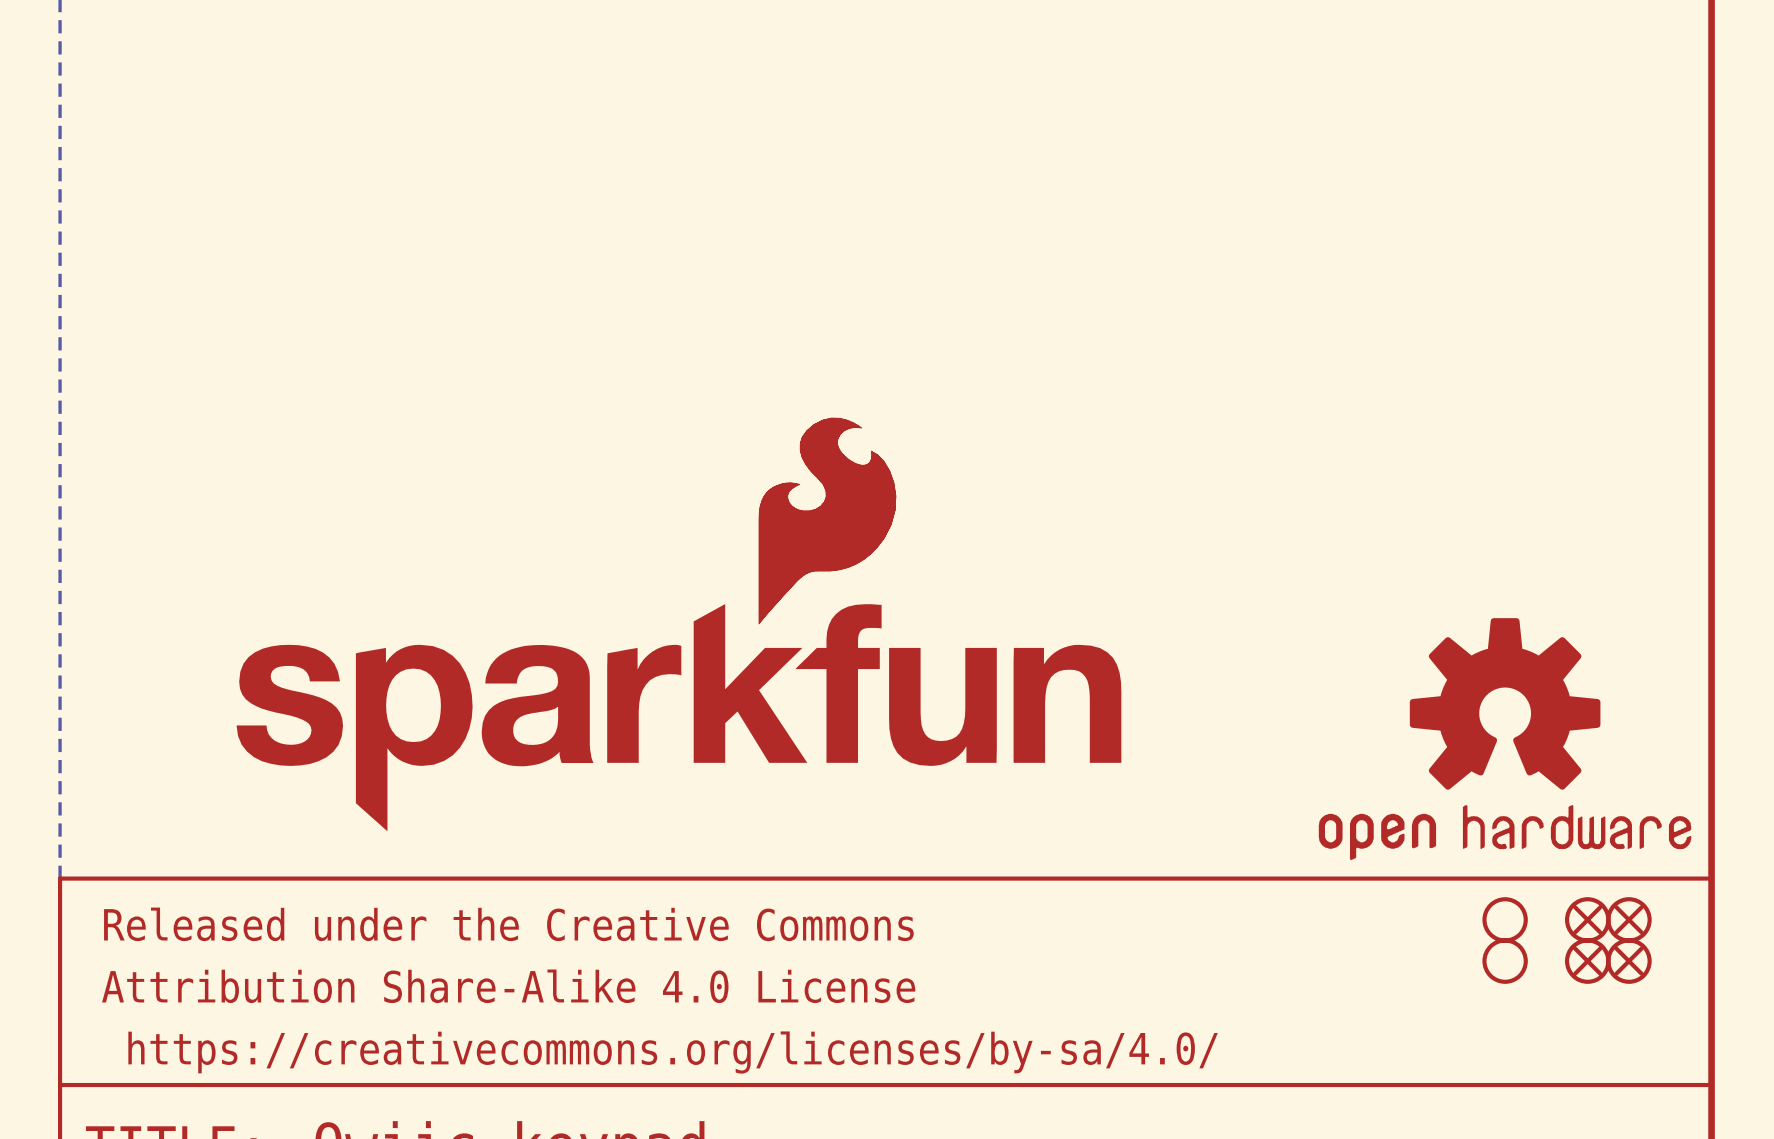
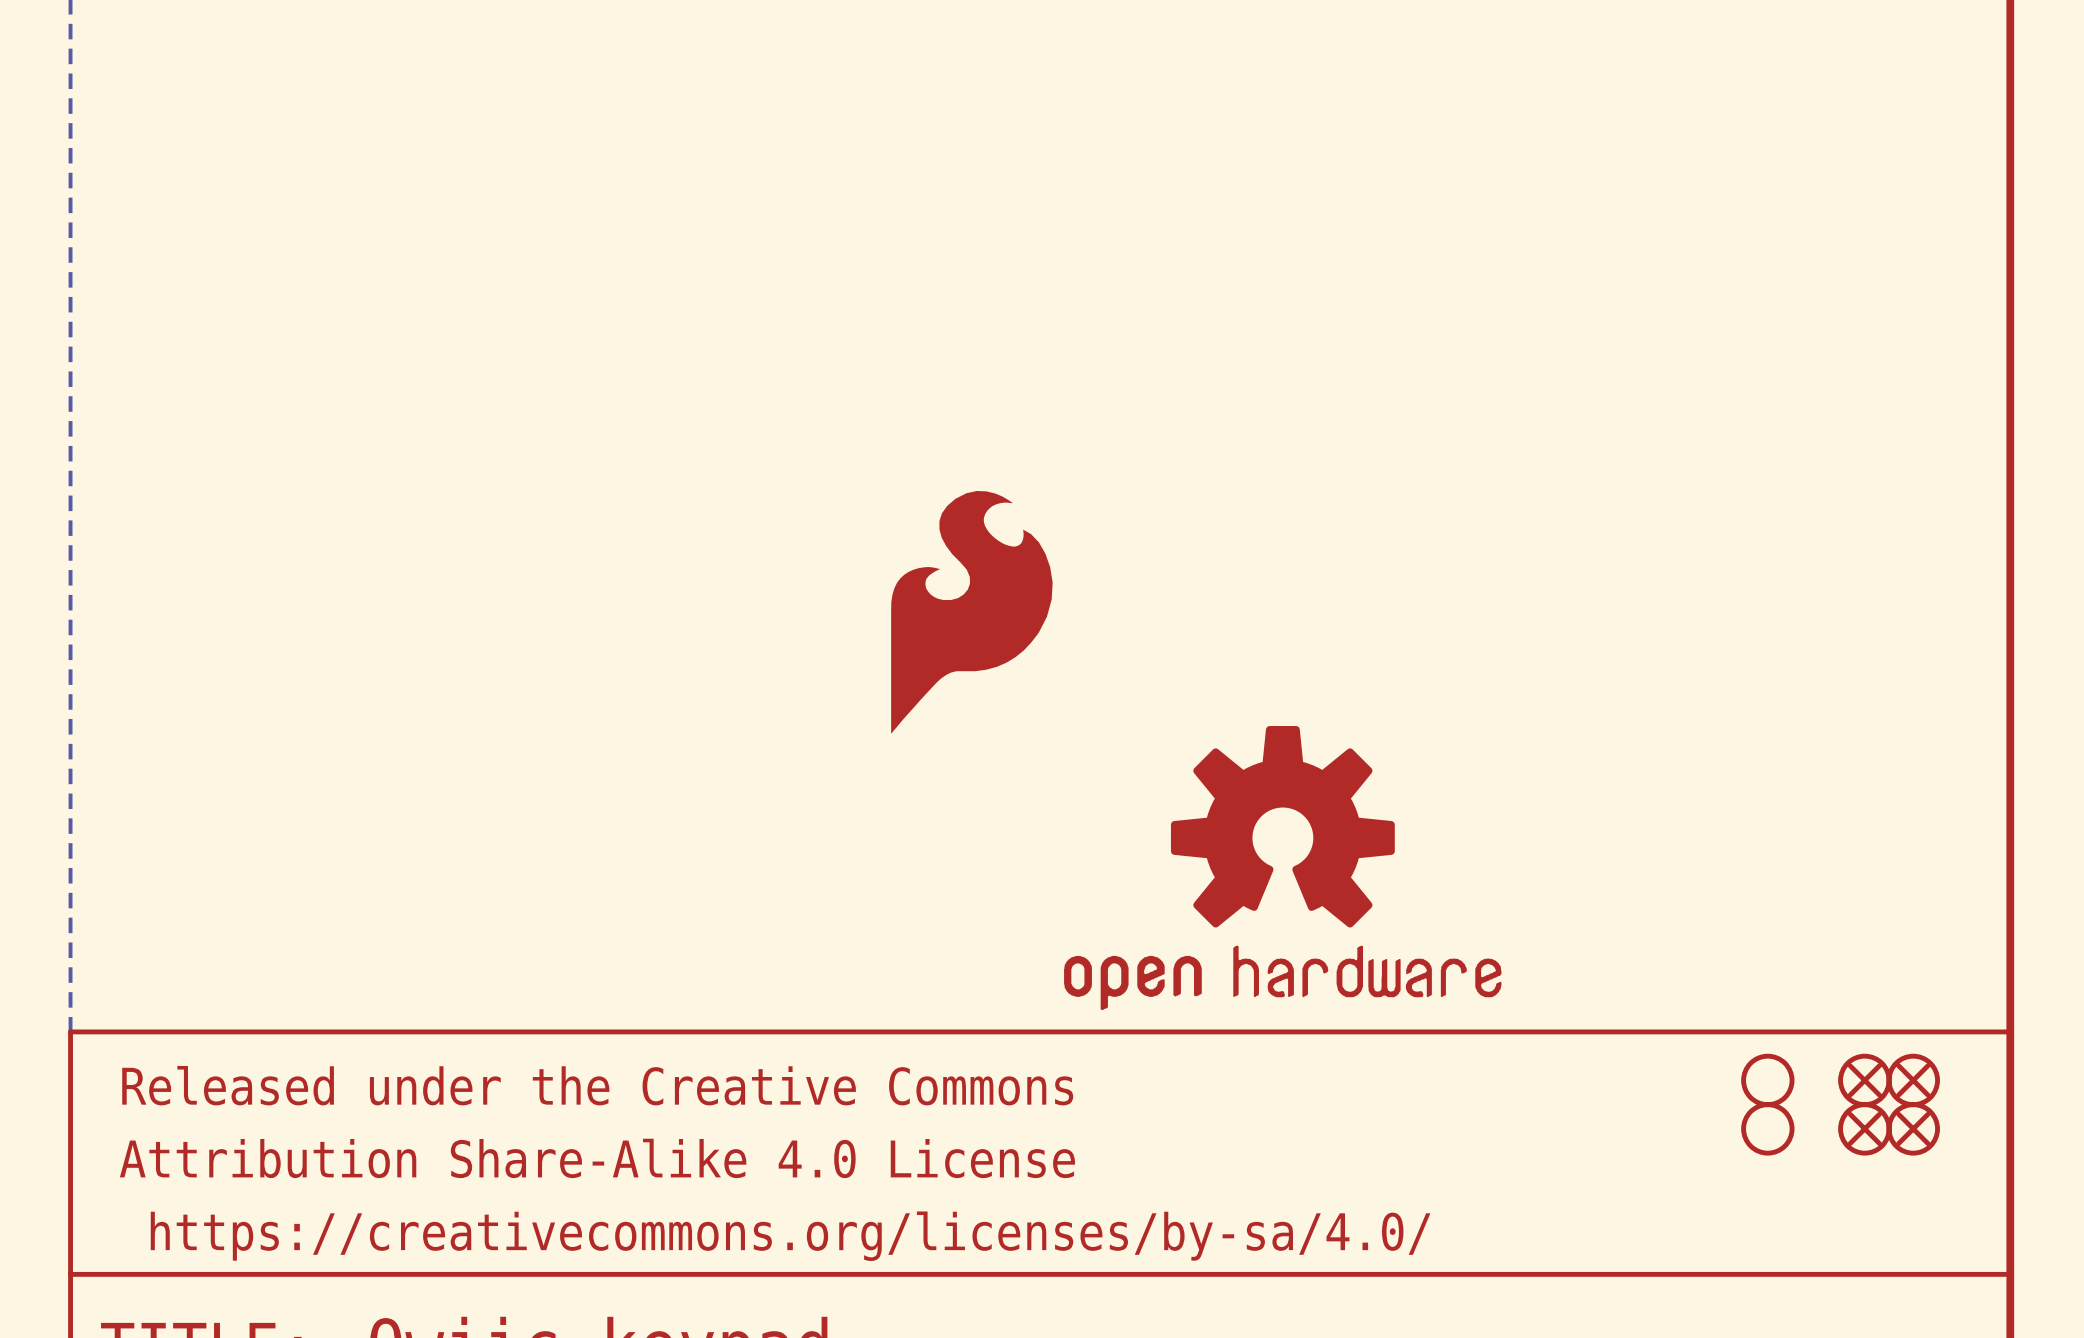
part: (678, 624) -> none
part: none -> (1282, 867)
part: (1505, 739) -> none

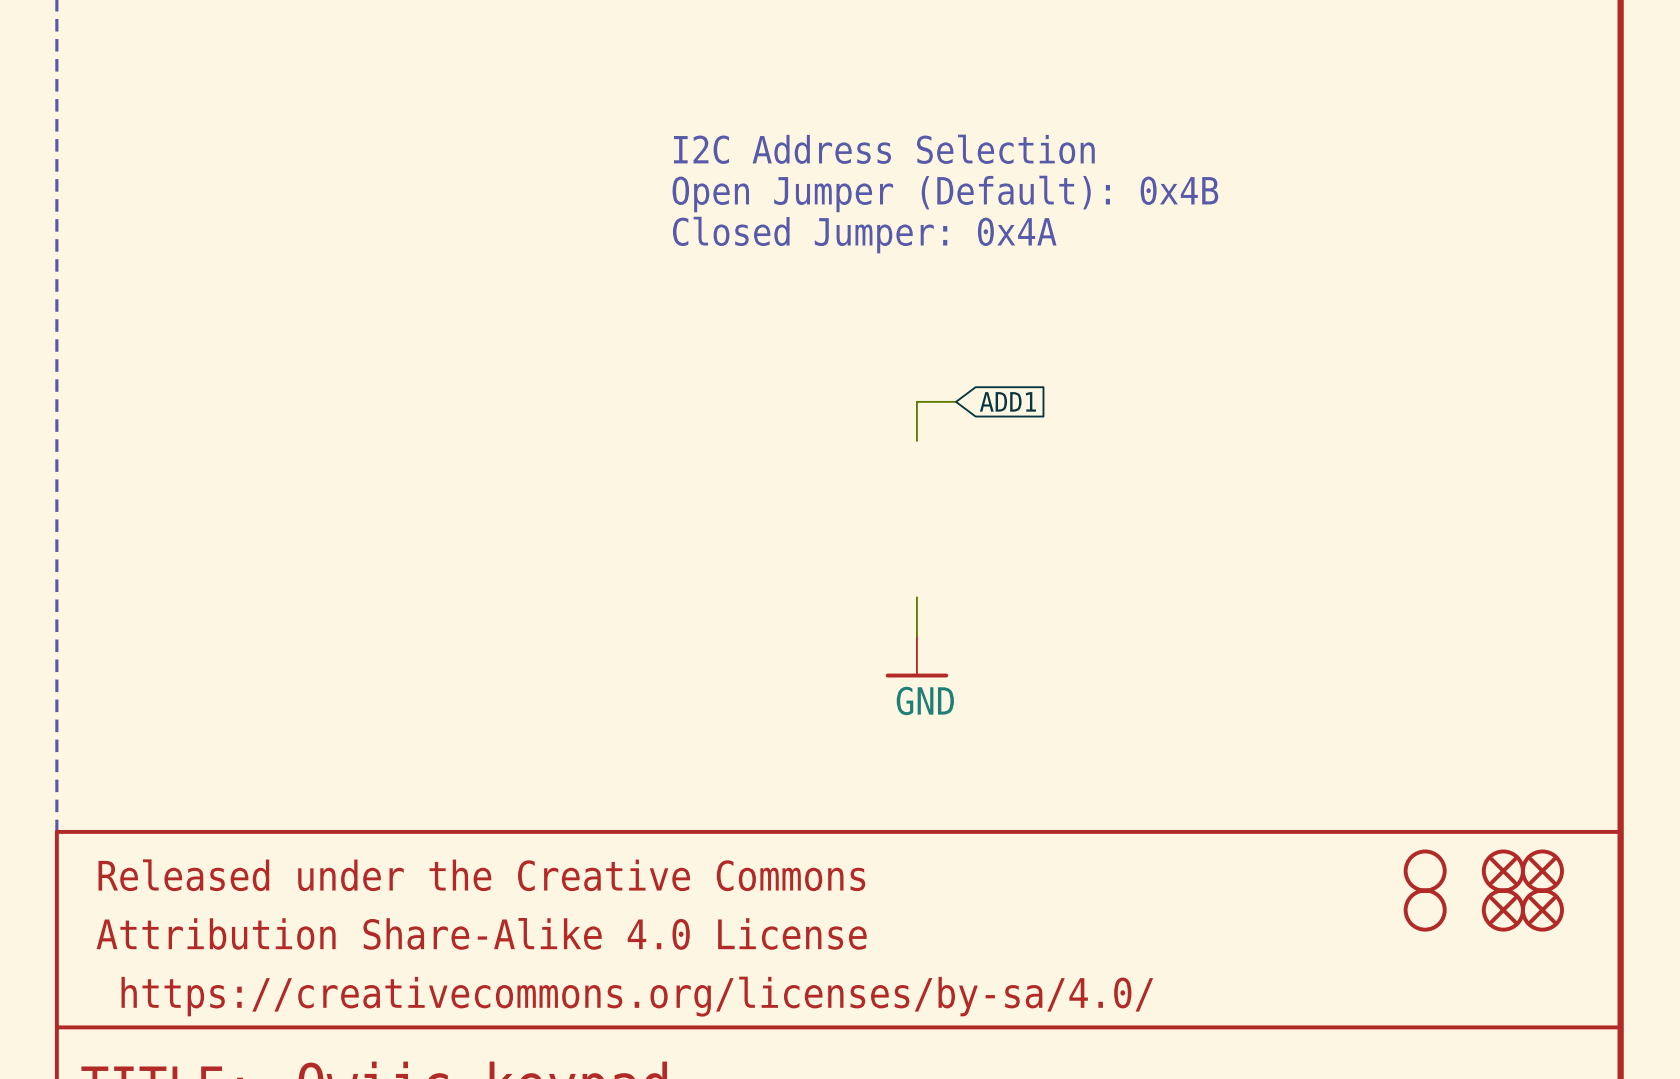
text: none -> I2C Address Selection (884, 149)
text: none -> Open Jumper (Default): 0x4B (945, 193)
text: none -> Closed Jumper: 0x4A (864, 235)
wire: none -> (956, 401) (916, 401) (916, 440)
global label: none -> ADD1 (1007, 401)
part: (971, 612) -> none
wire: none -> (916, 597) (916, 636)
power symbol: none -> GND (916, 656)
part: (1282, 867) -> none

